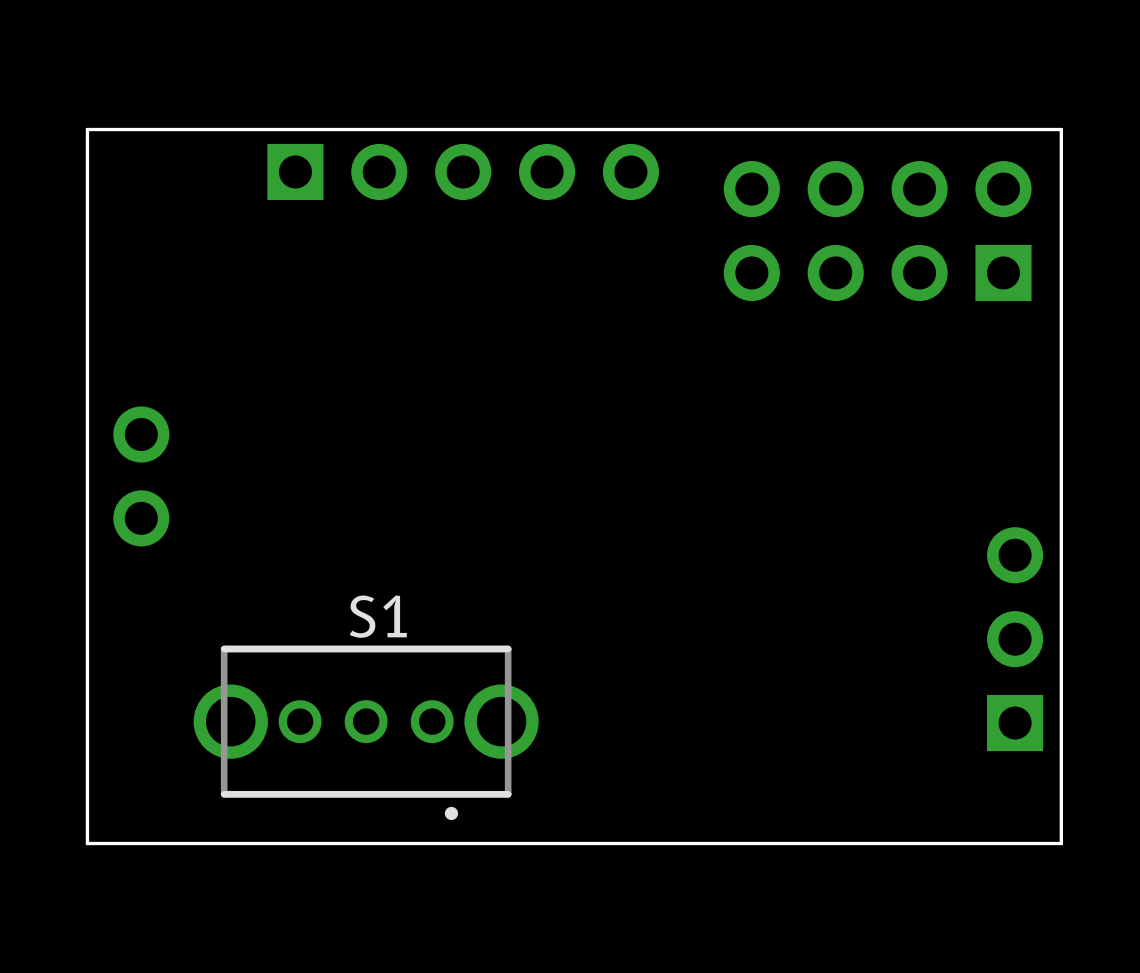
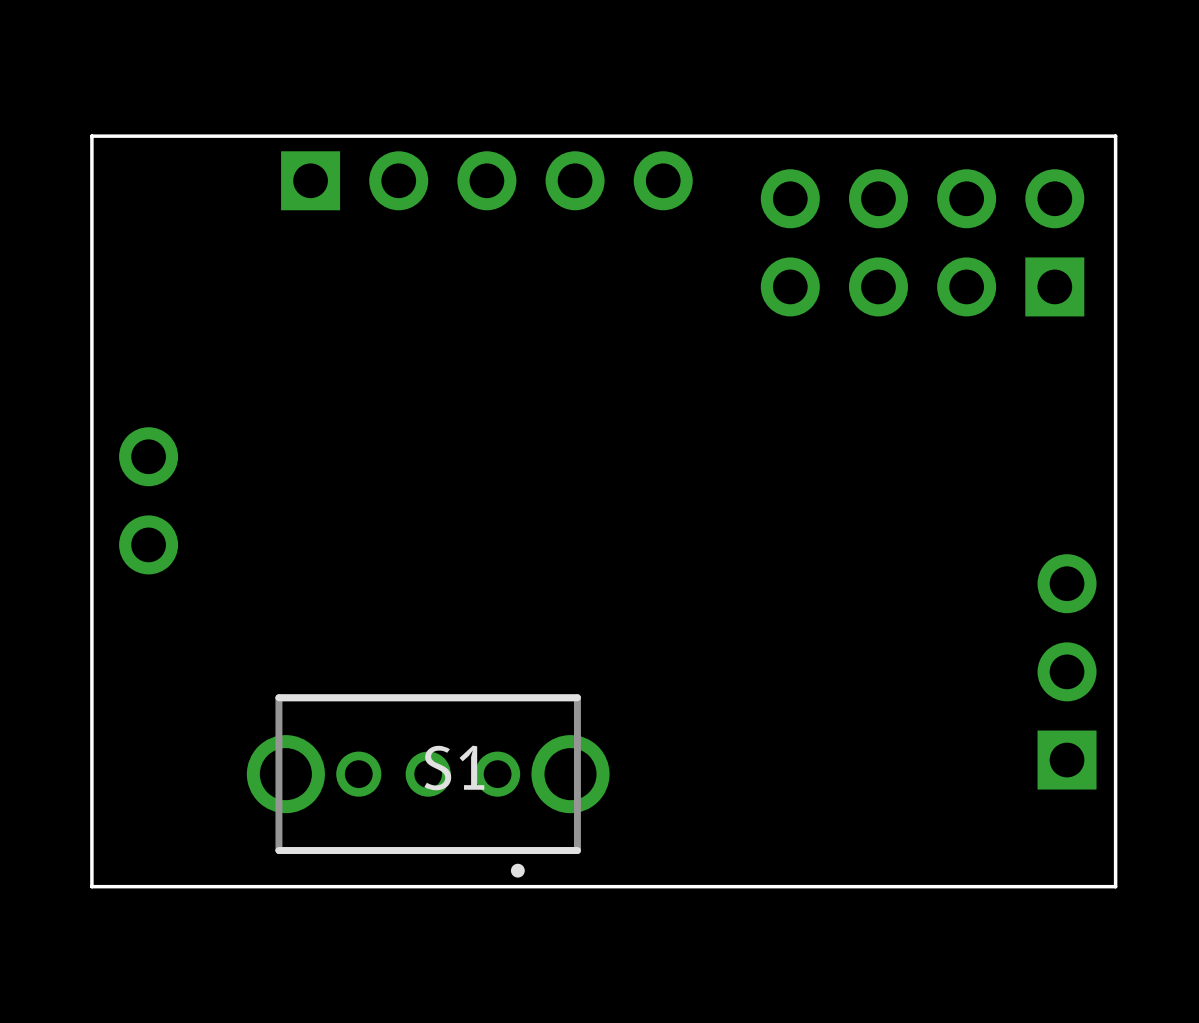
S1 name position: S1 (378, 616) -> S1 (454, 767)
S1 position: (366, 732) -> (428, 785)

